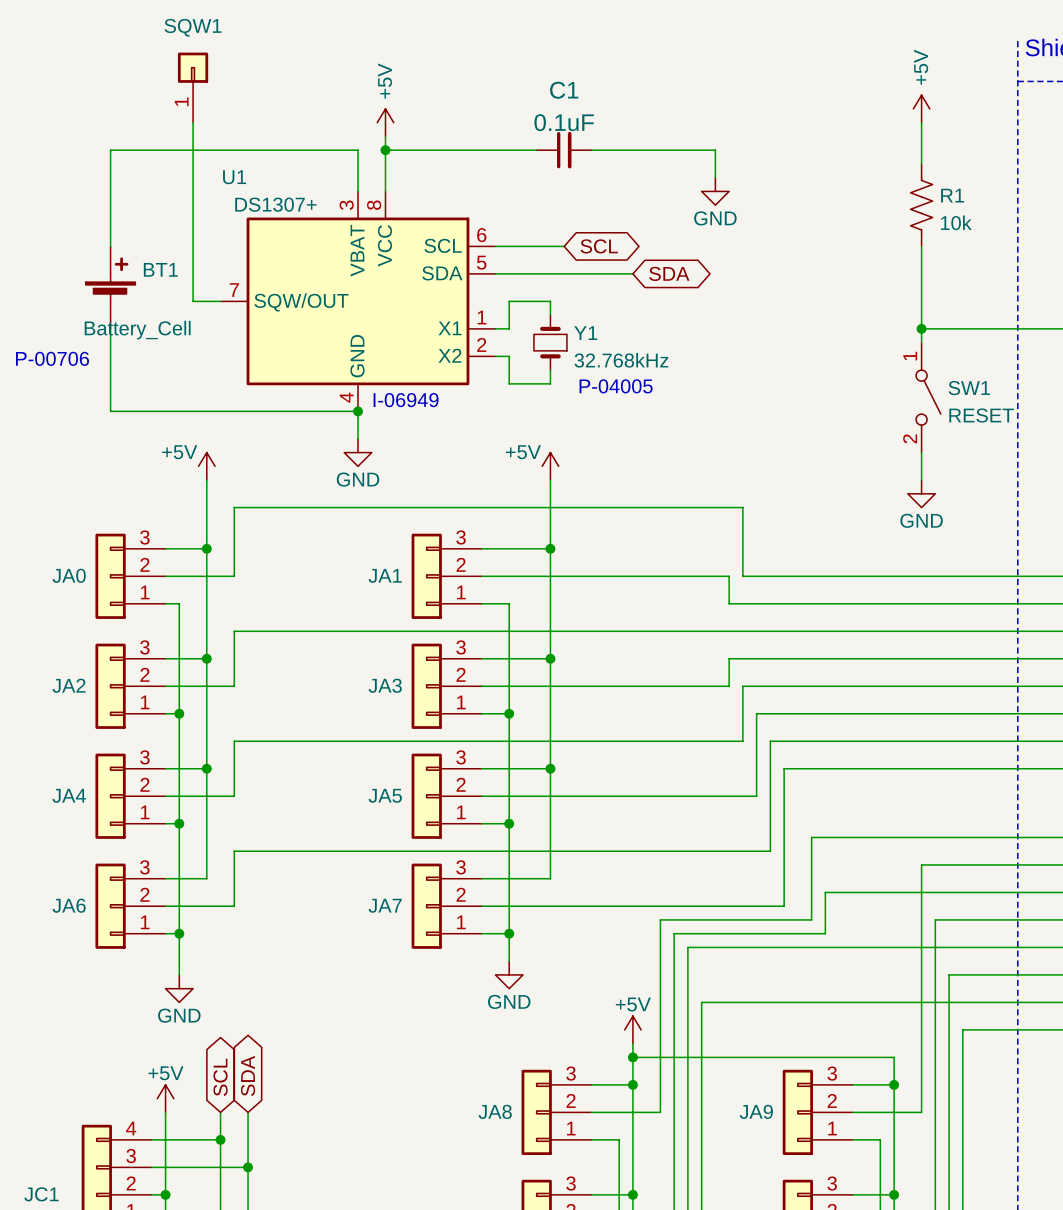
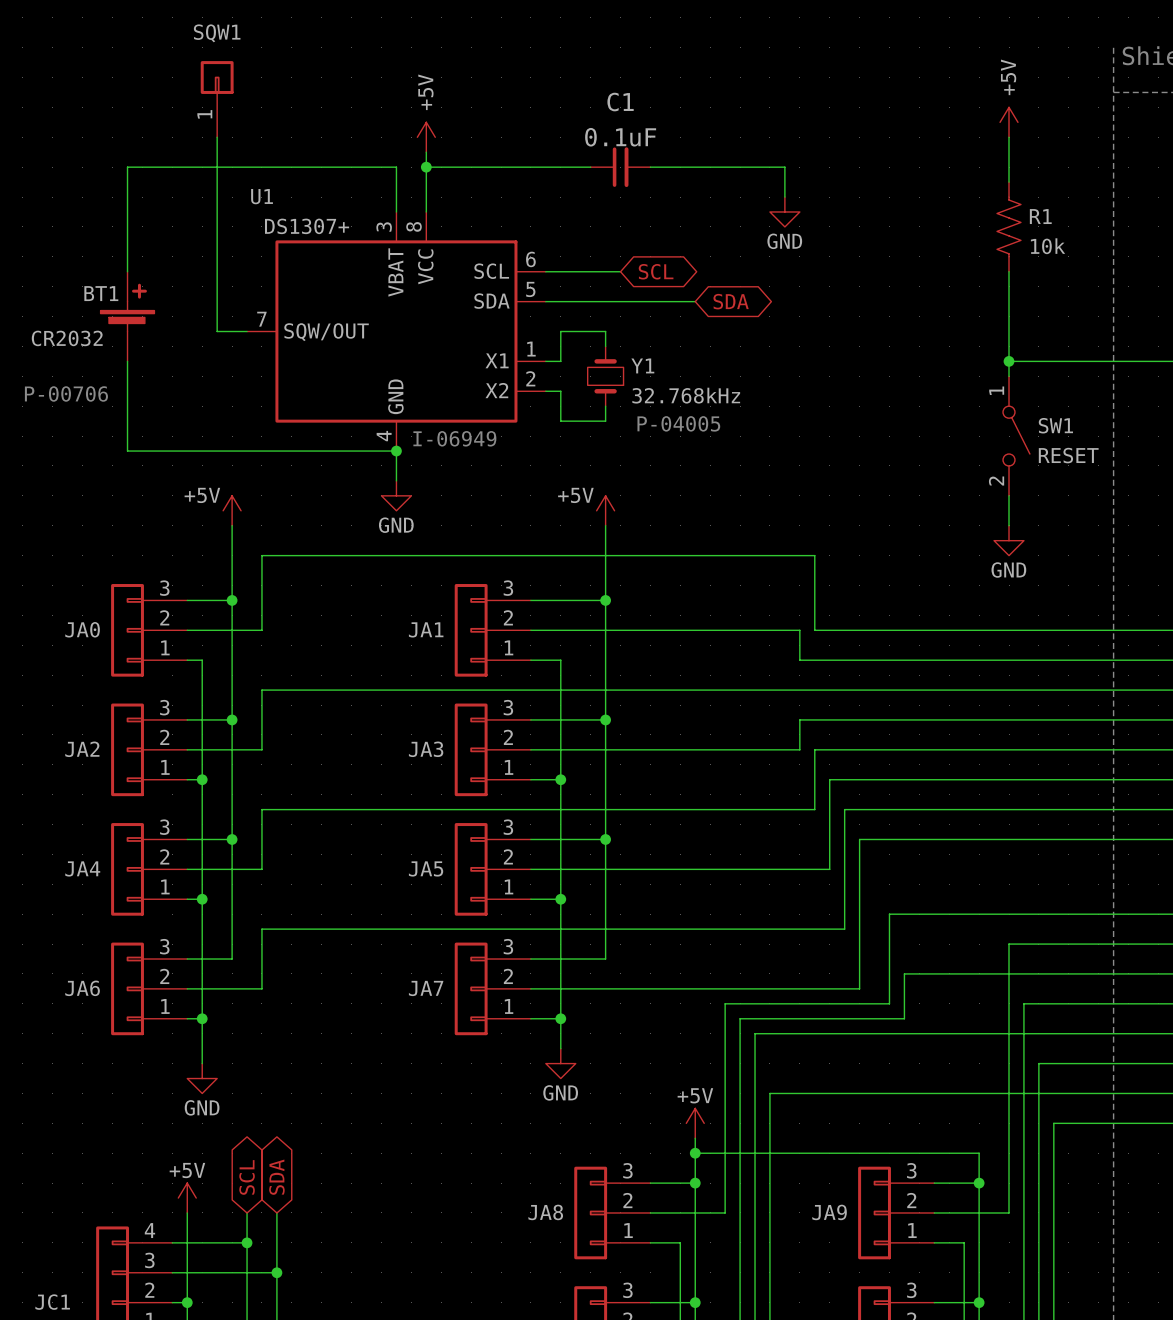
BT1 name position: BT1 (160, 269) -> BT1 (101, 293)
BT1 value: Battery_Cell (137, 330) -> CR2032 (67, 338)

